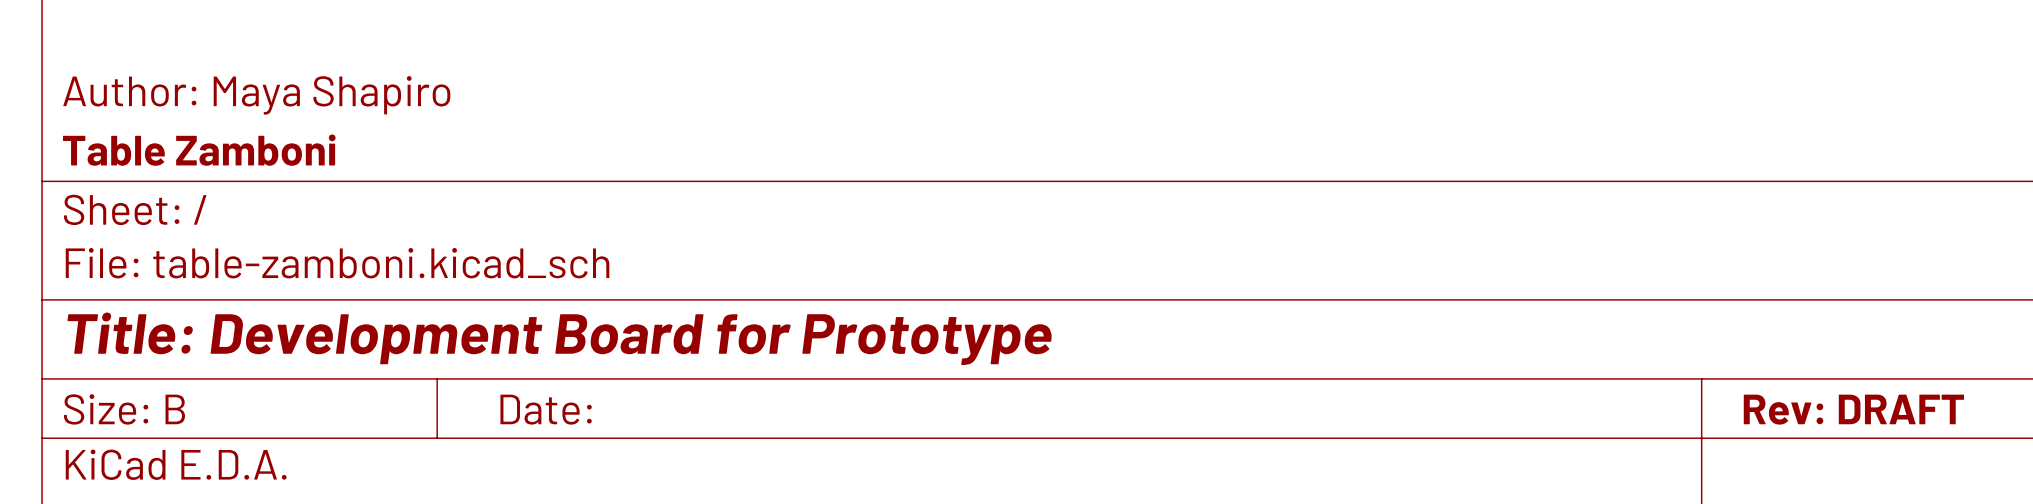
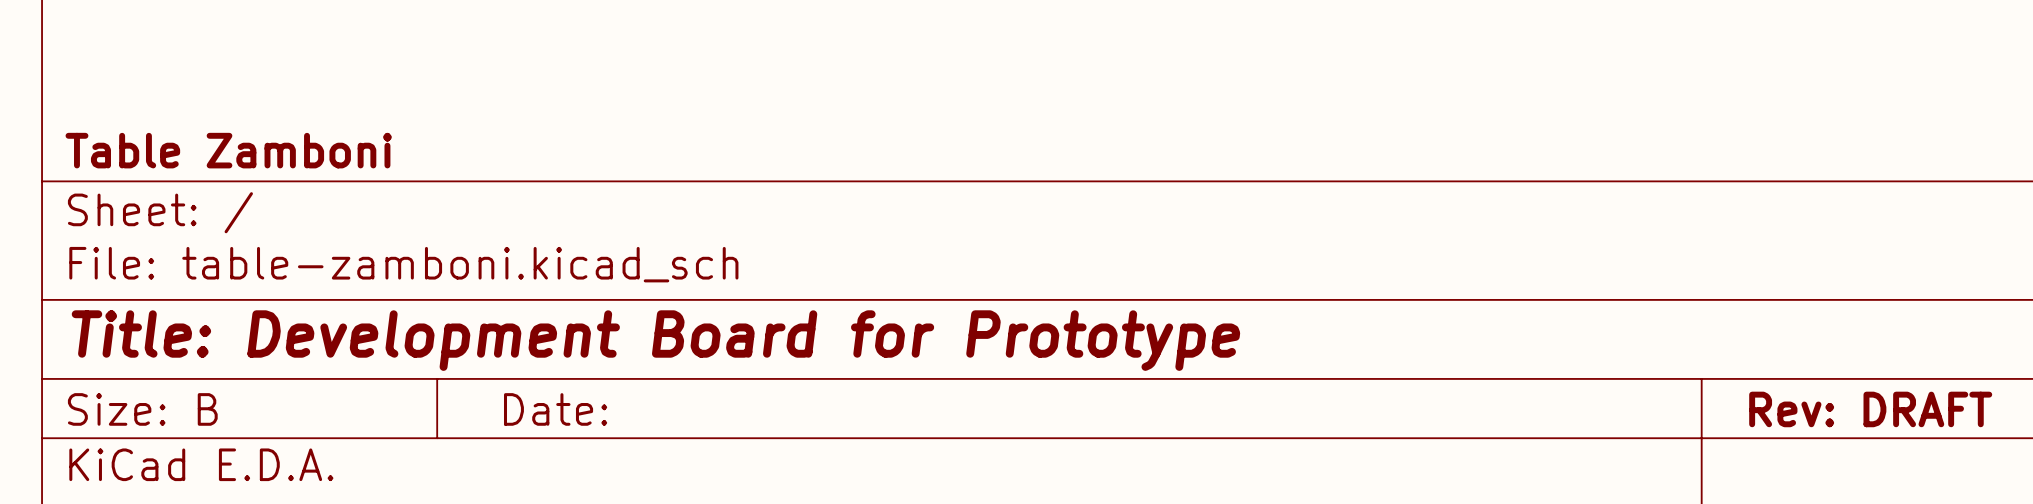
title block: Author: Maya Shapiro (256, 95) -> none

